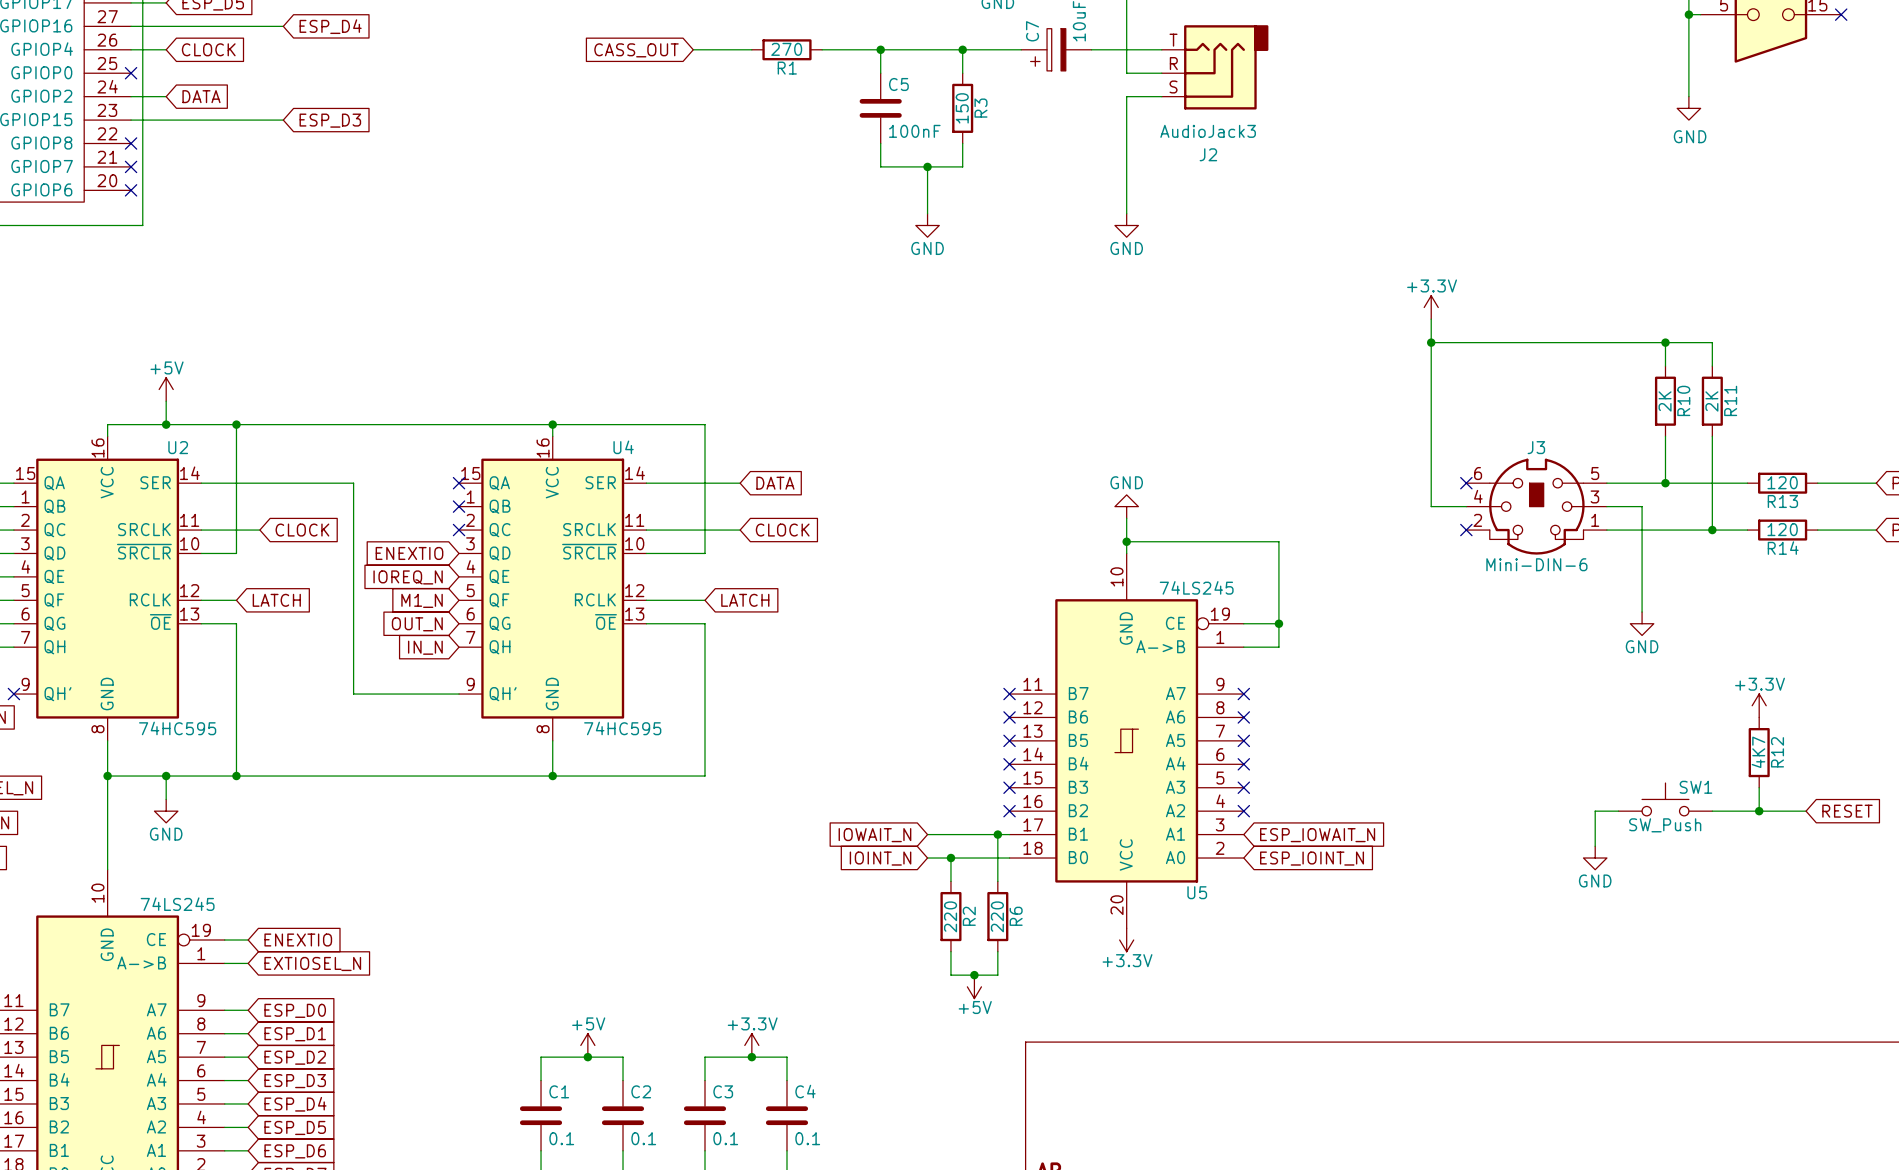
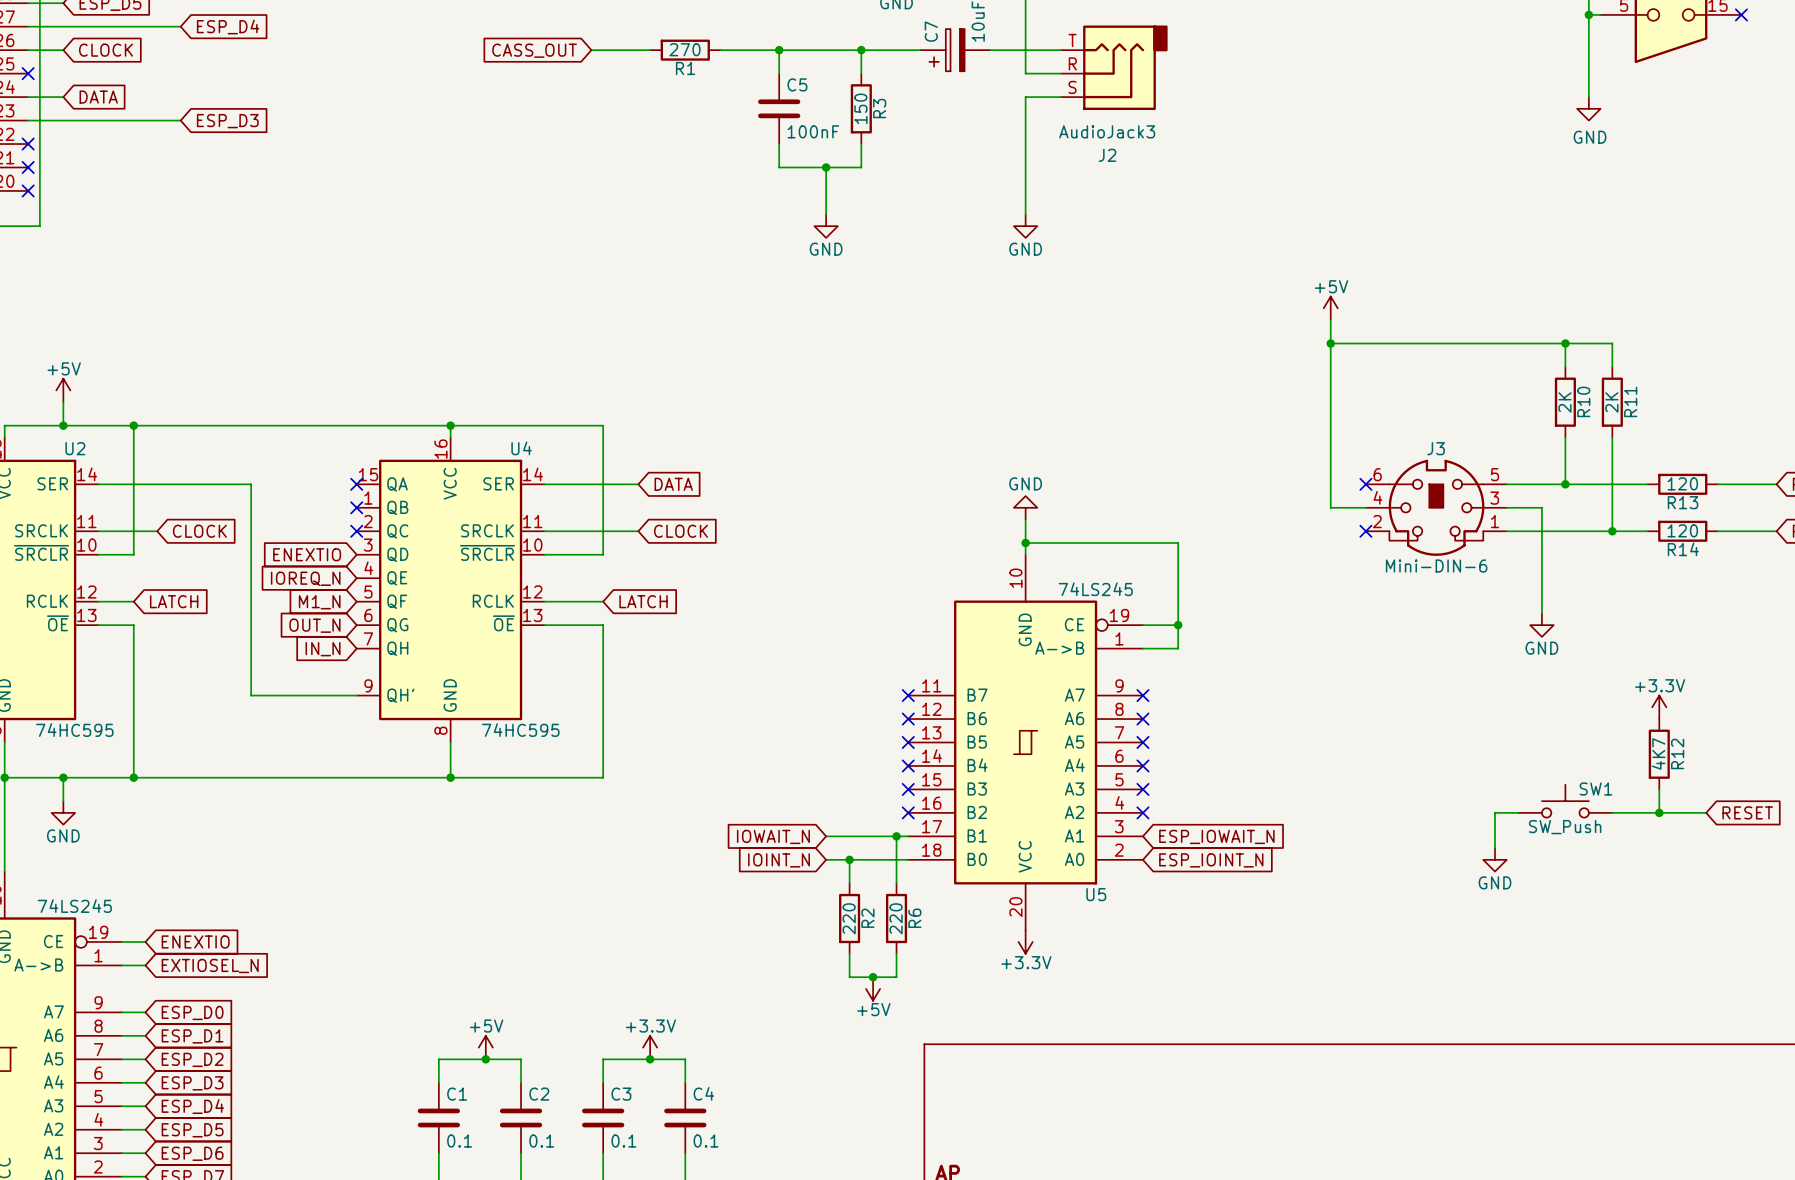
power symbol: +3.3V (1431, 307) -> +5V (1330, 308)

